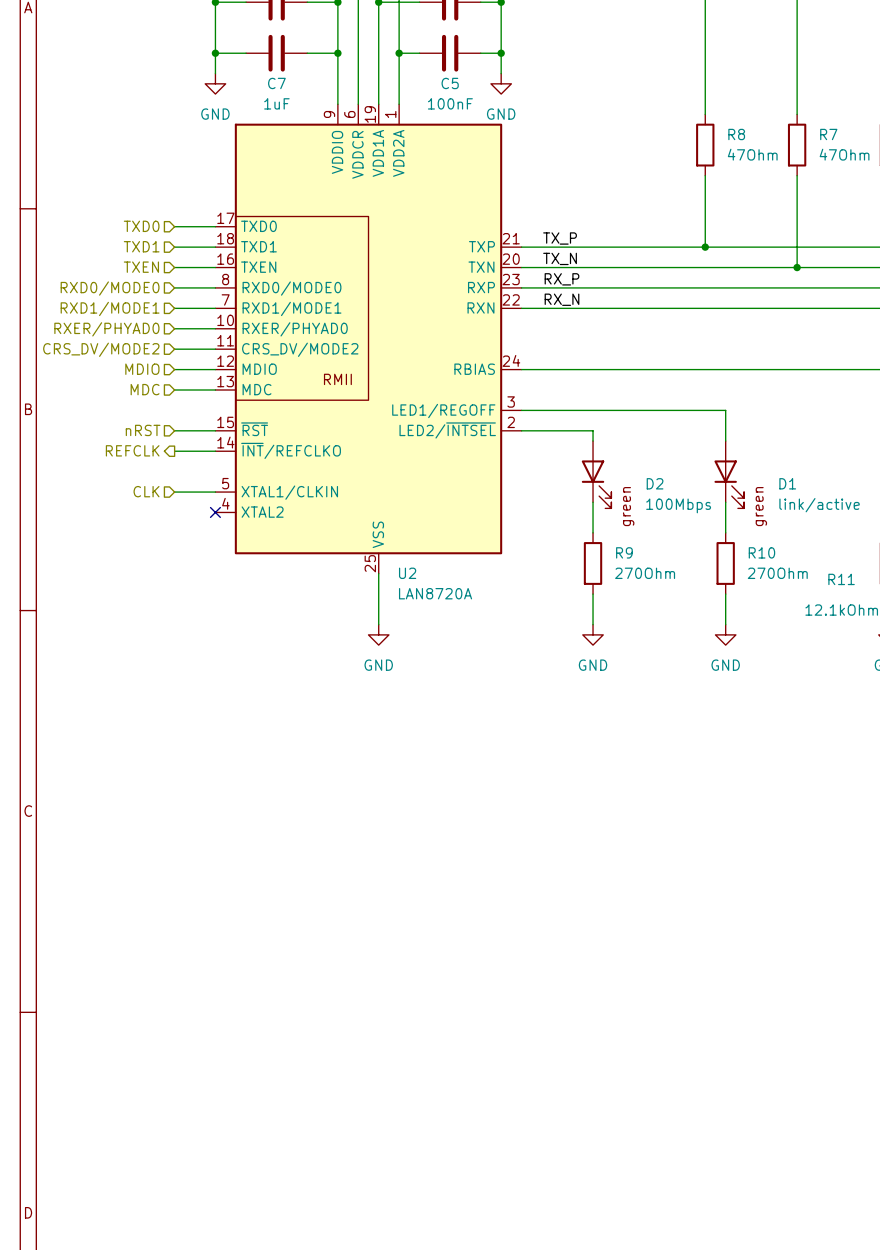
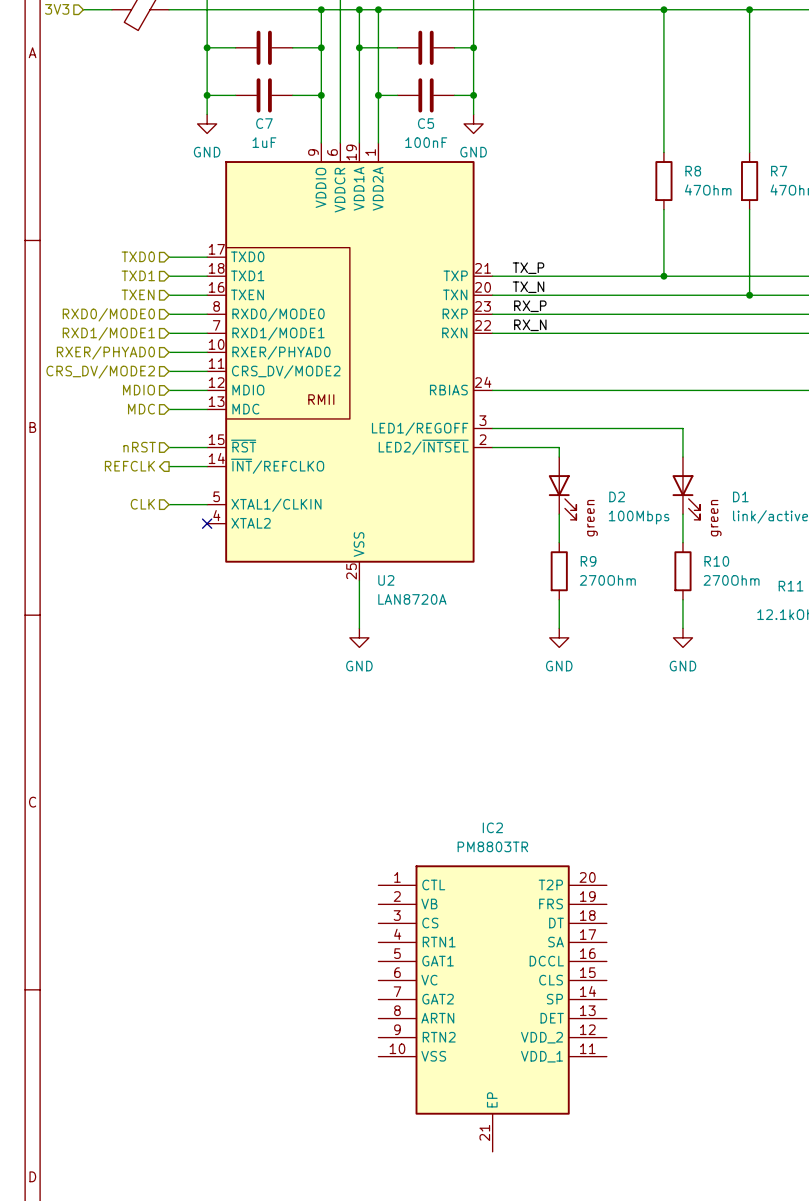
IC2: none -> PM8803TR (492, 1008)

